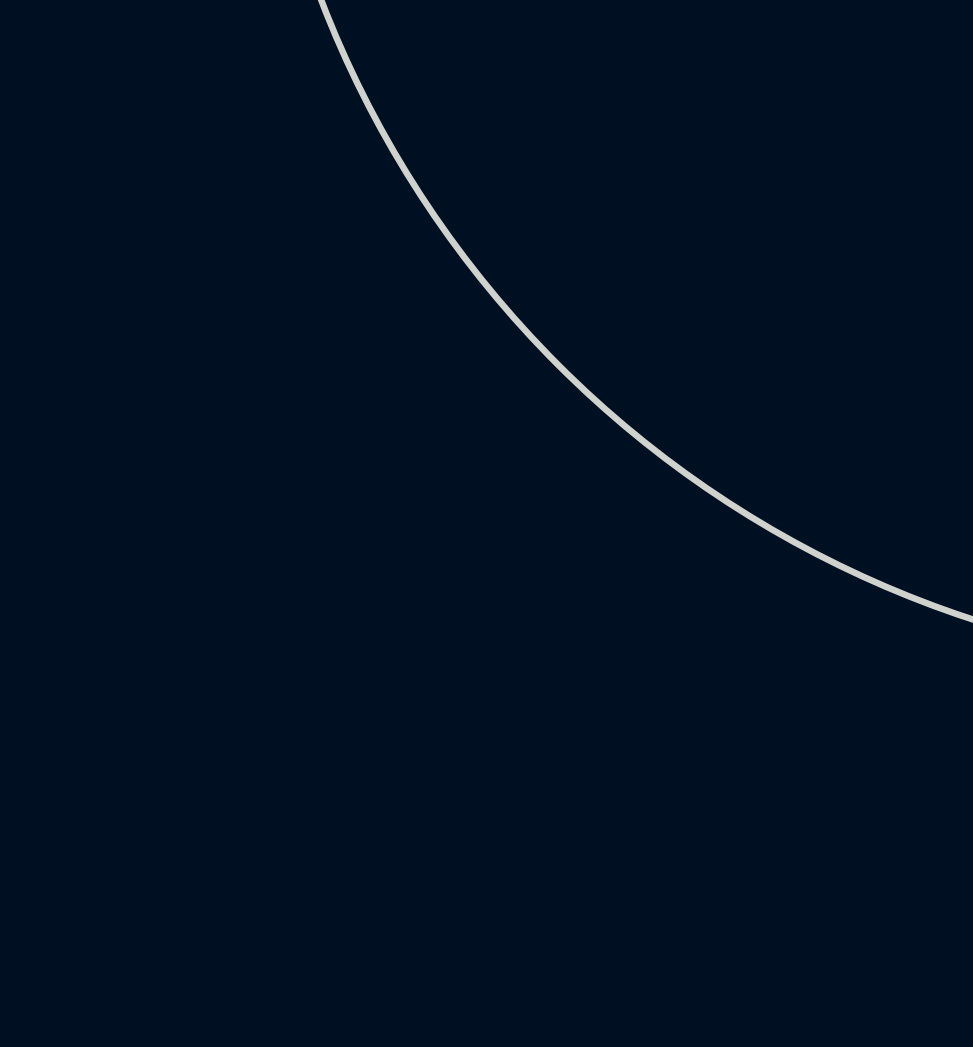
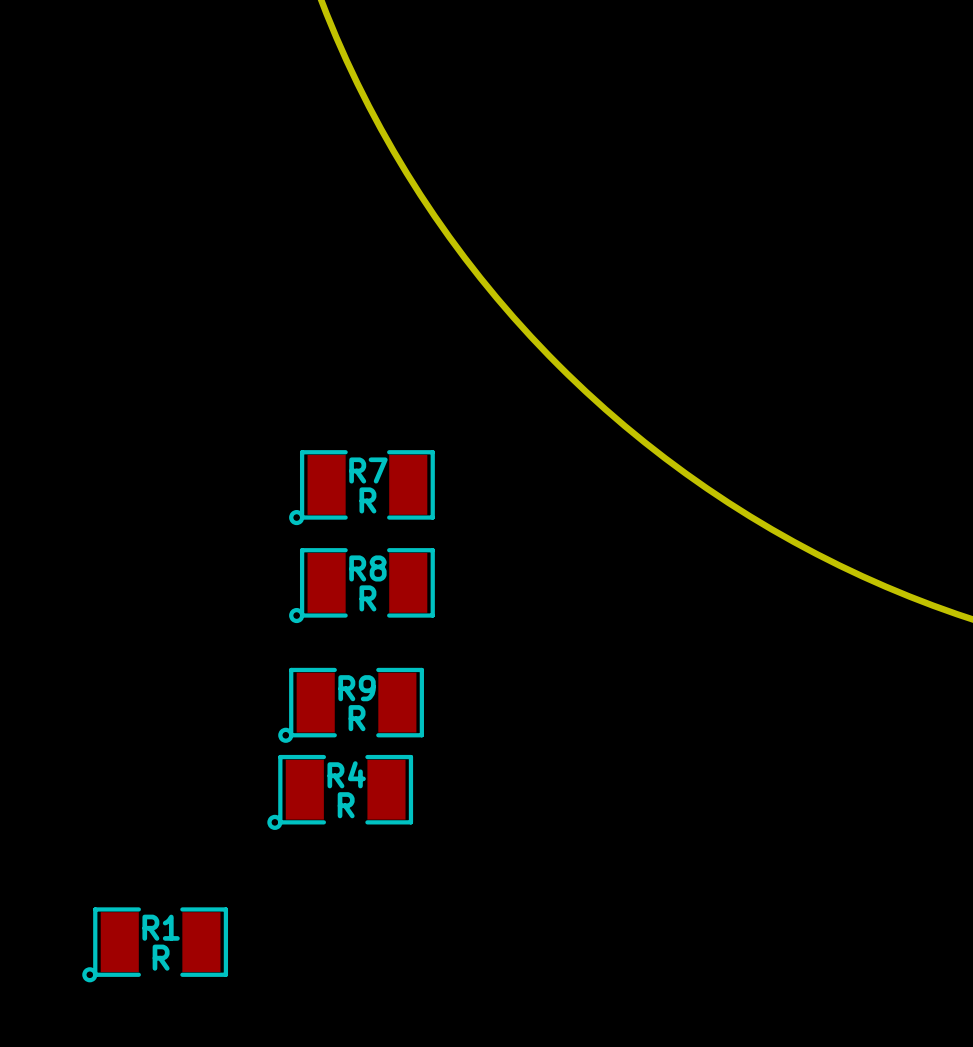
R7: none -> R (361, 487)
R8: none -> R (361, 585)
R9: none -> R (351, 705)
R4: none -> R (340, 792)
R1: none -> R (155, 944)

